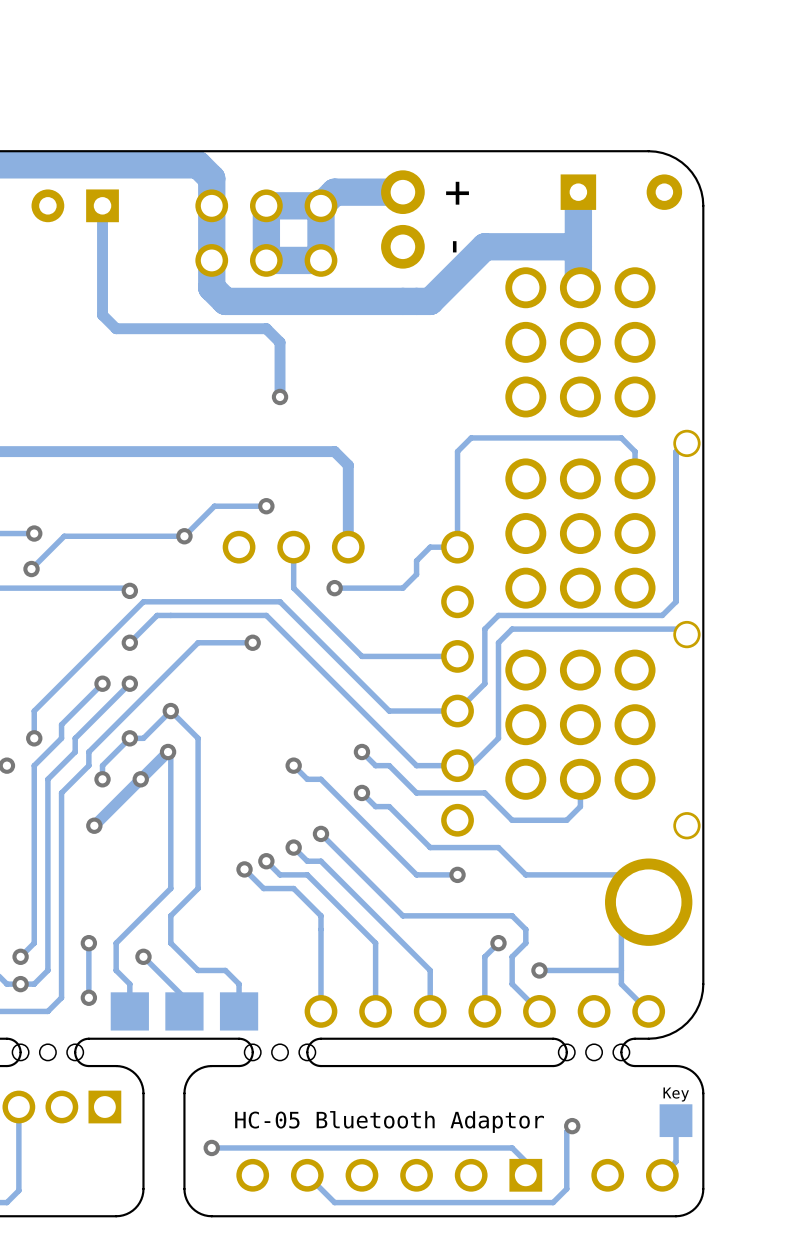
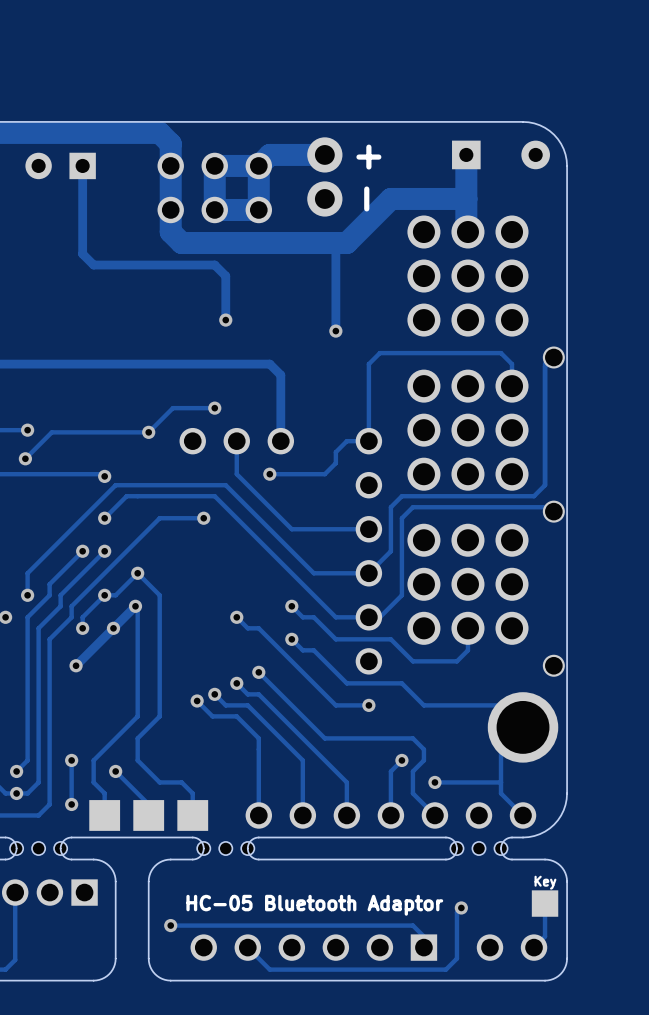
track: none -> (335, 243) (335, 331)
via: none -> (335, 331)

